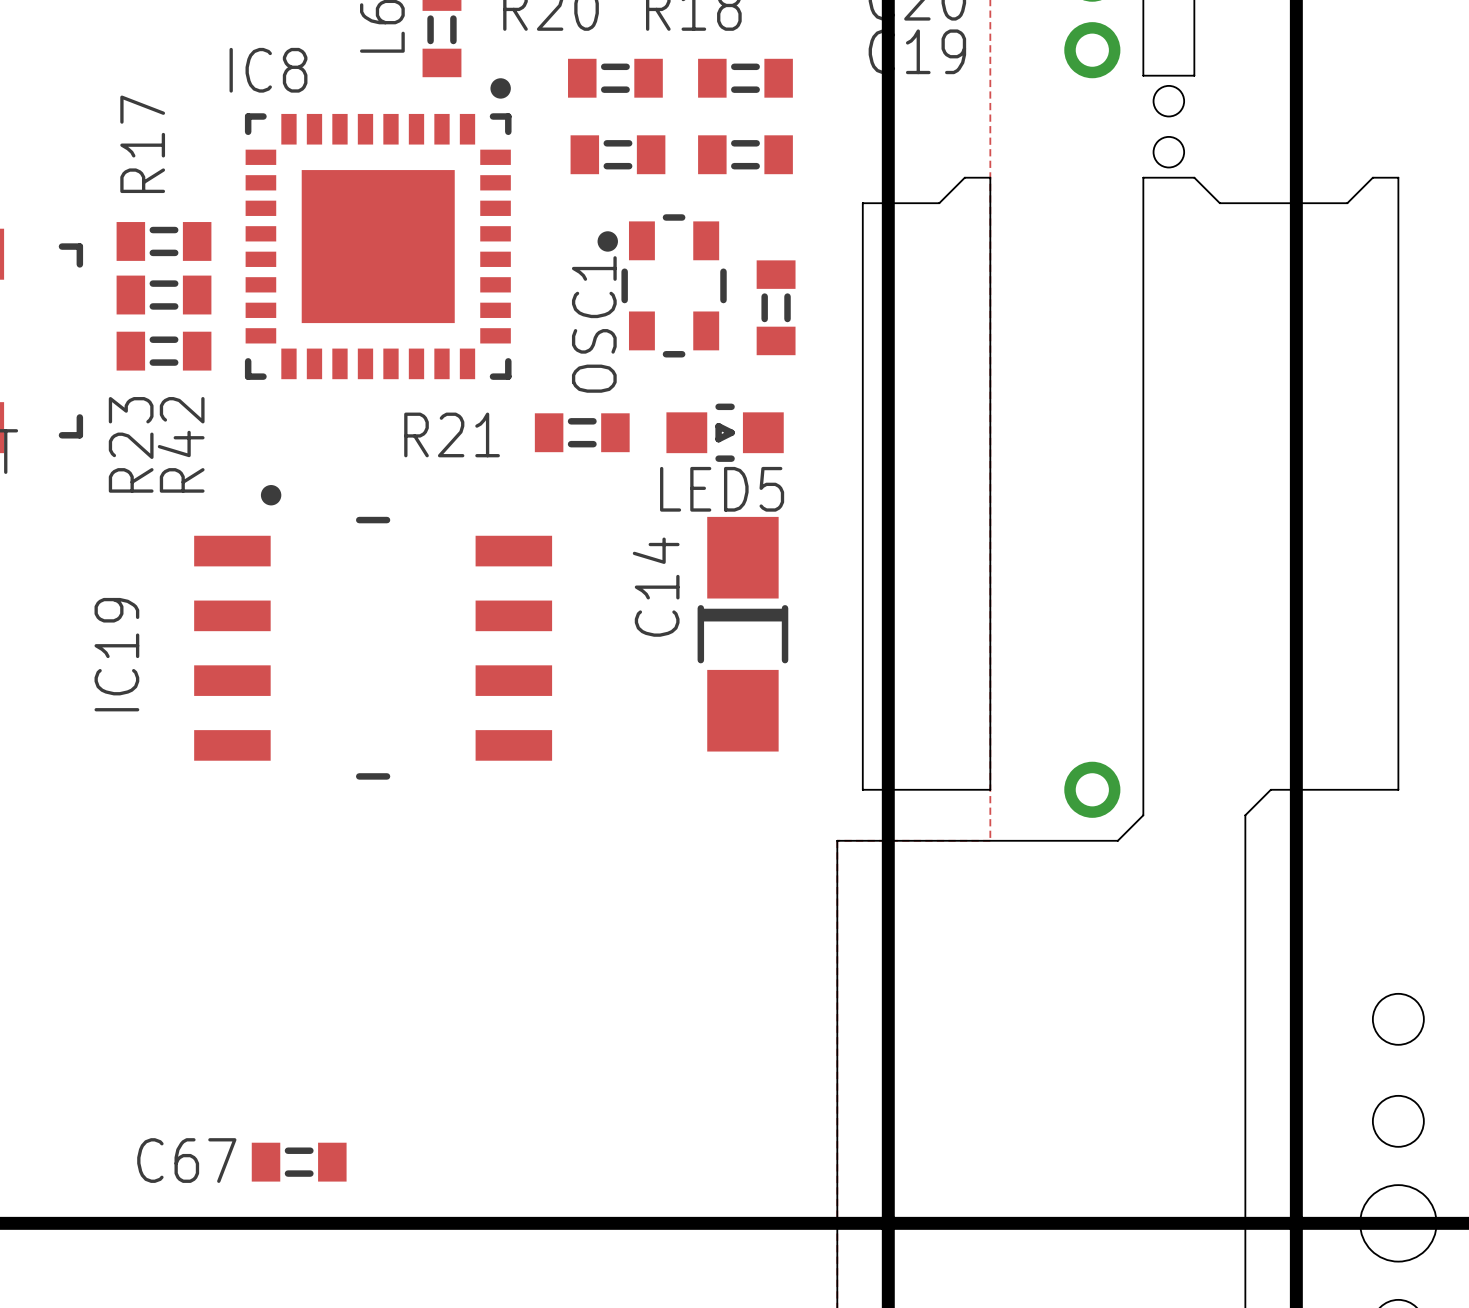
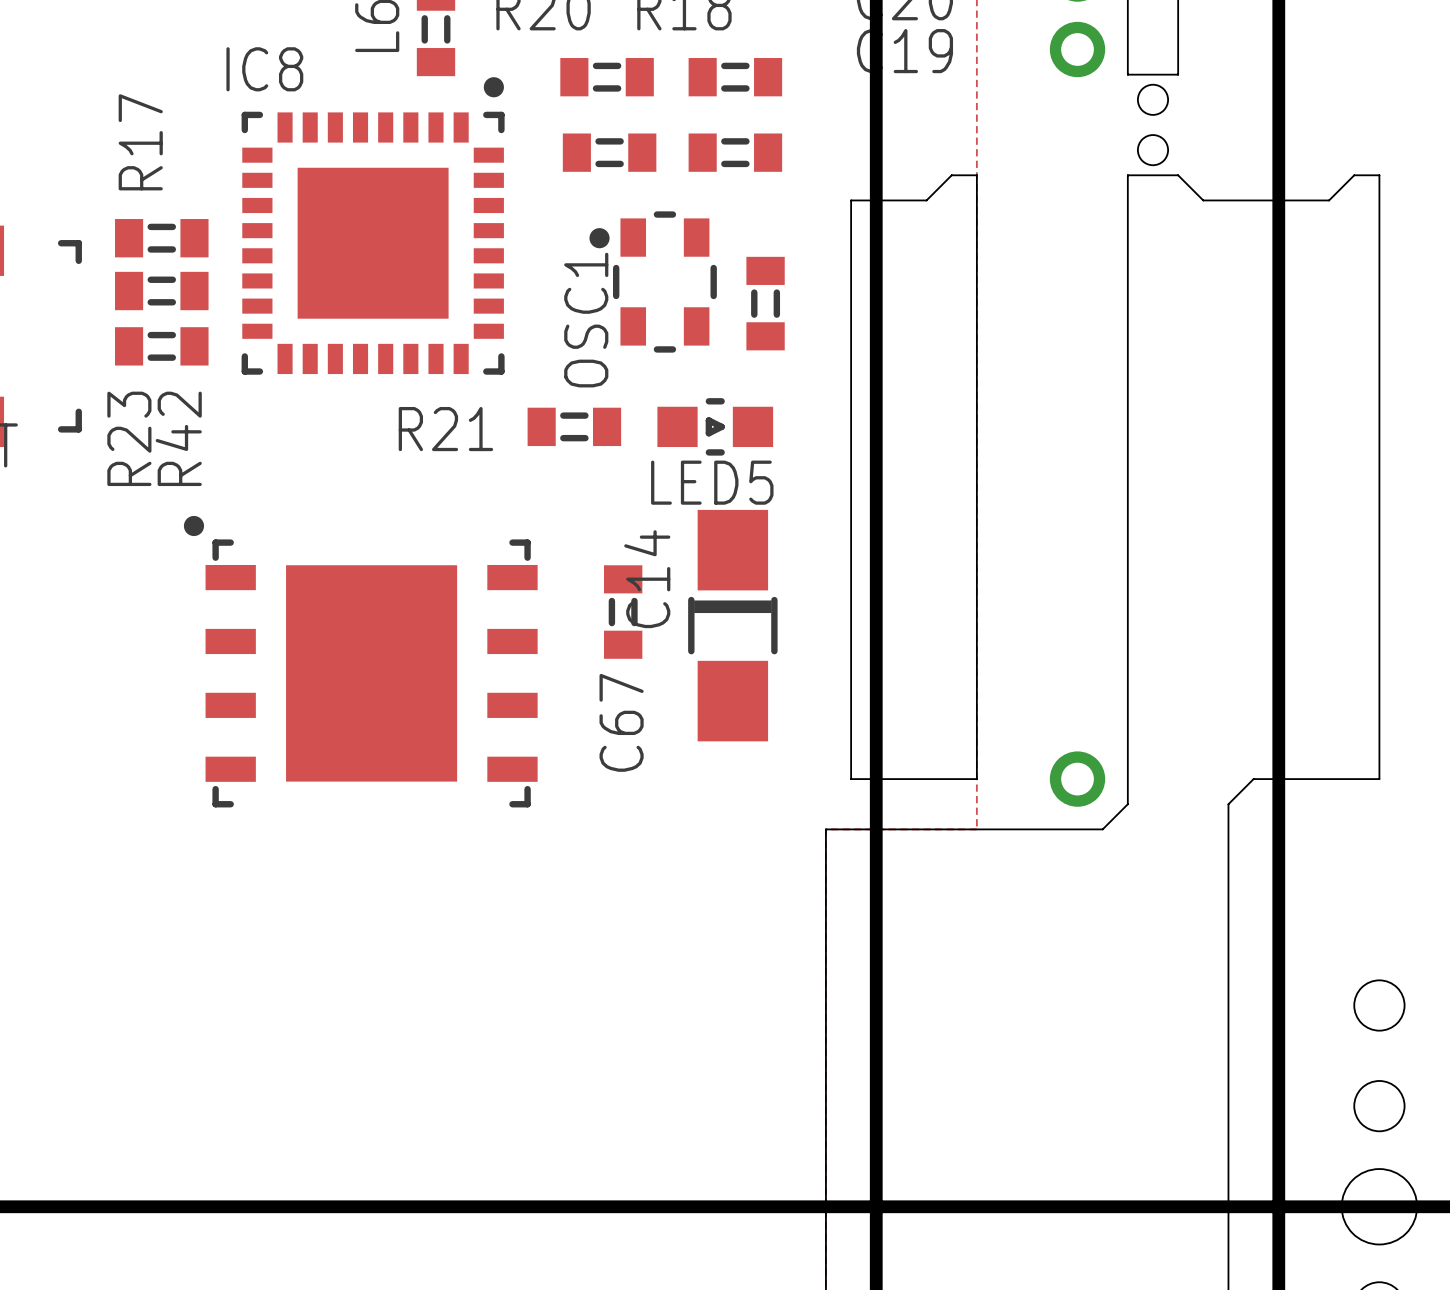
IC19: (373, 632) -> none
part: none -> (360, 661)
C67 name position: C67 (186, 1160) -> C67 (621, 722)
C67 rotation: 0° (299, 1162) -> 90° clockwise (623, 612)
C67 position: (299, 1162) -> (623, 612)

